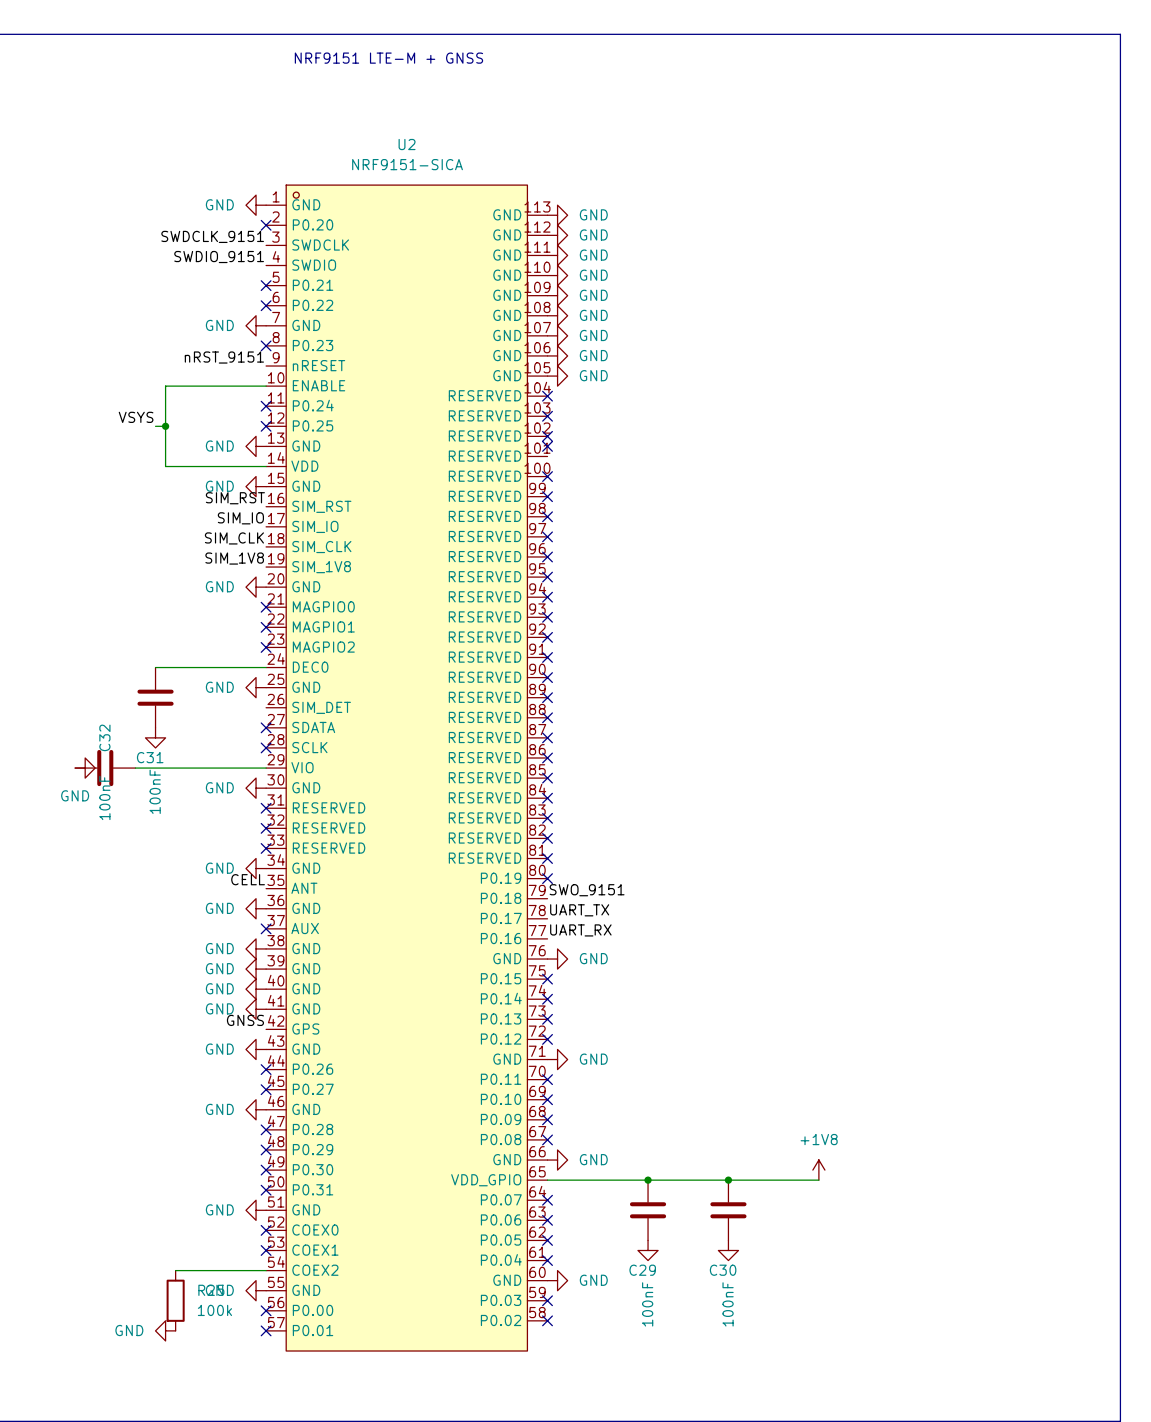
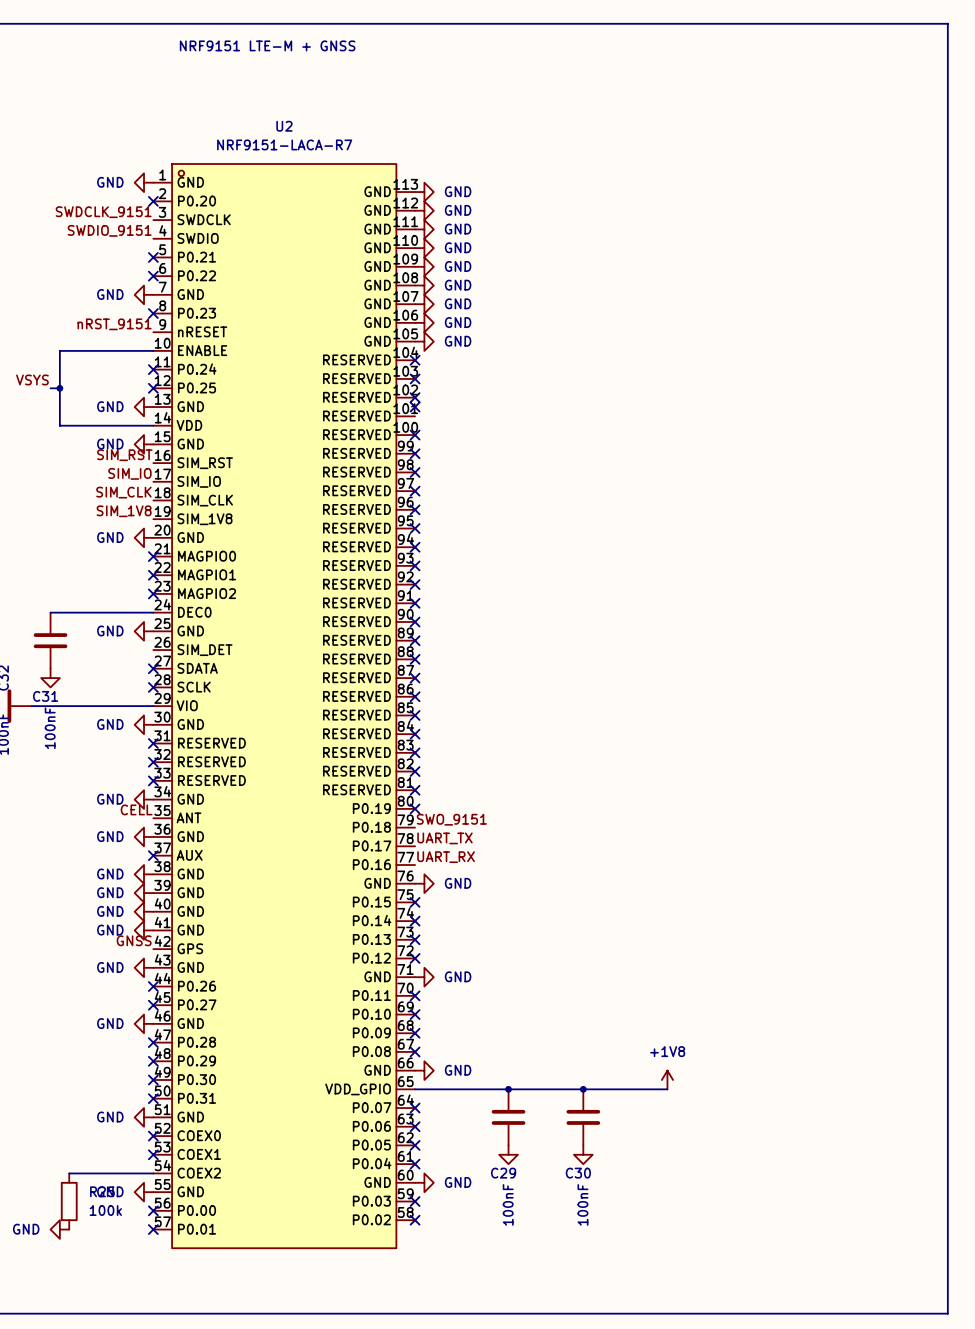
U2 value: NRF9151-SICA (407, 164) -> NRF9151-LACA-R7 (284, 144)

